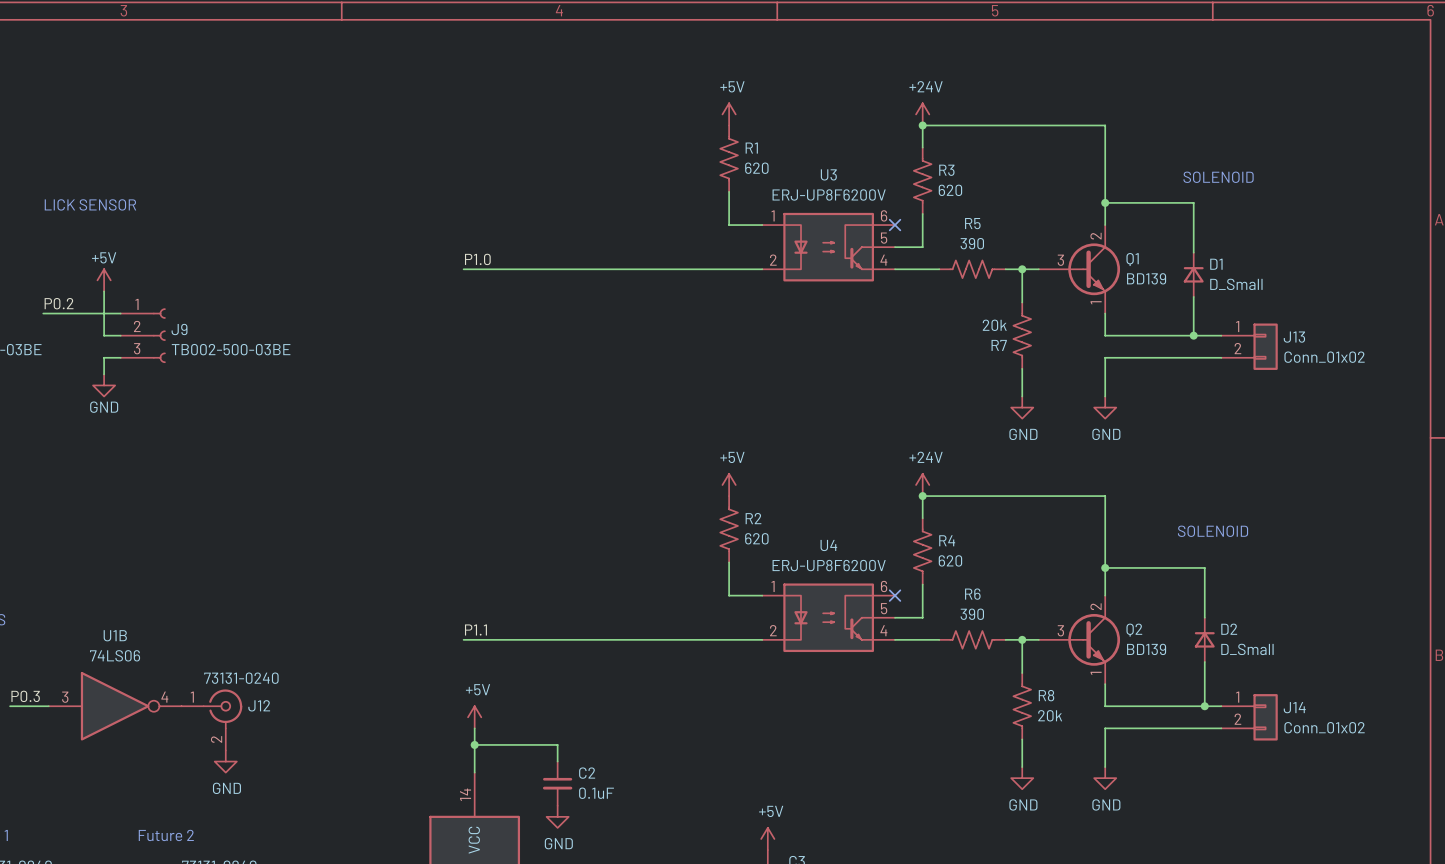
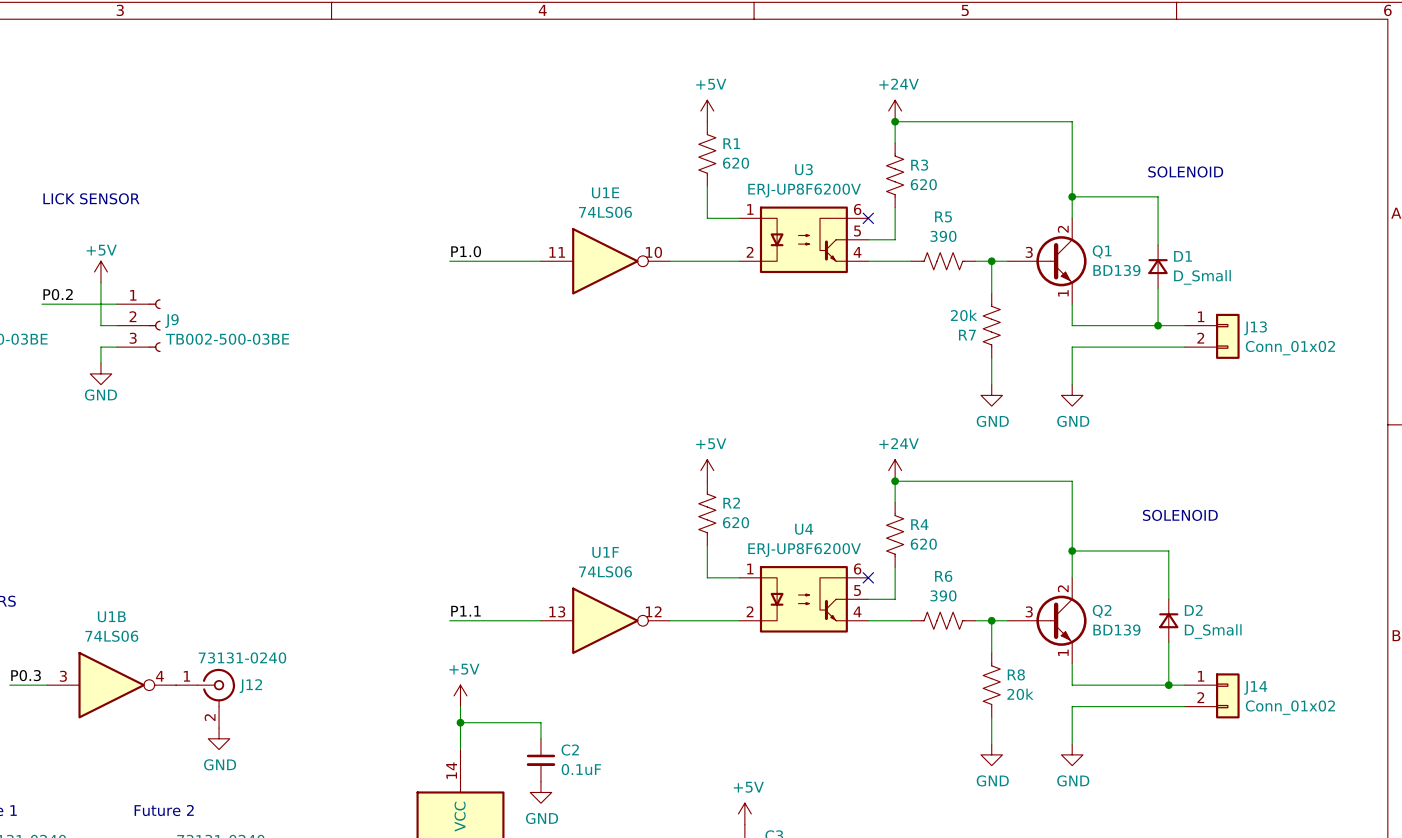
U1E: none -> 74LS06 (605, 261)
U1F: none -> 74LS06 (605, 620)

